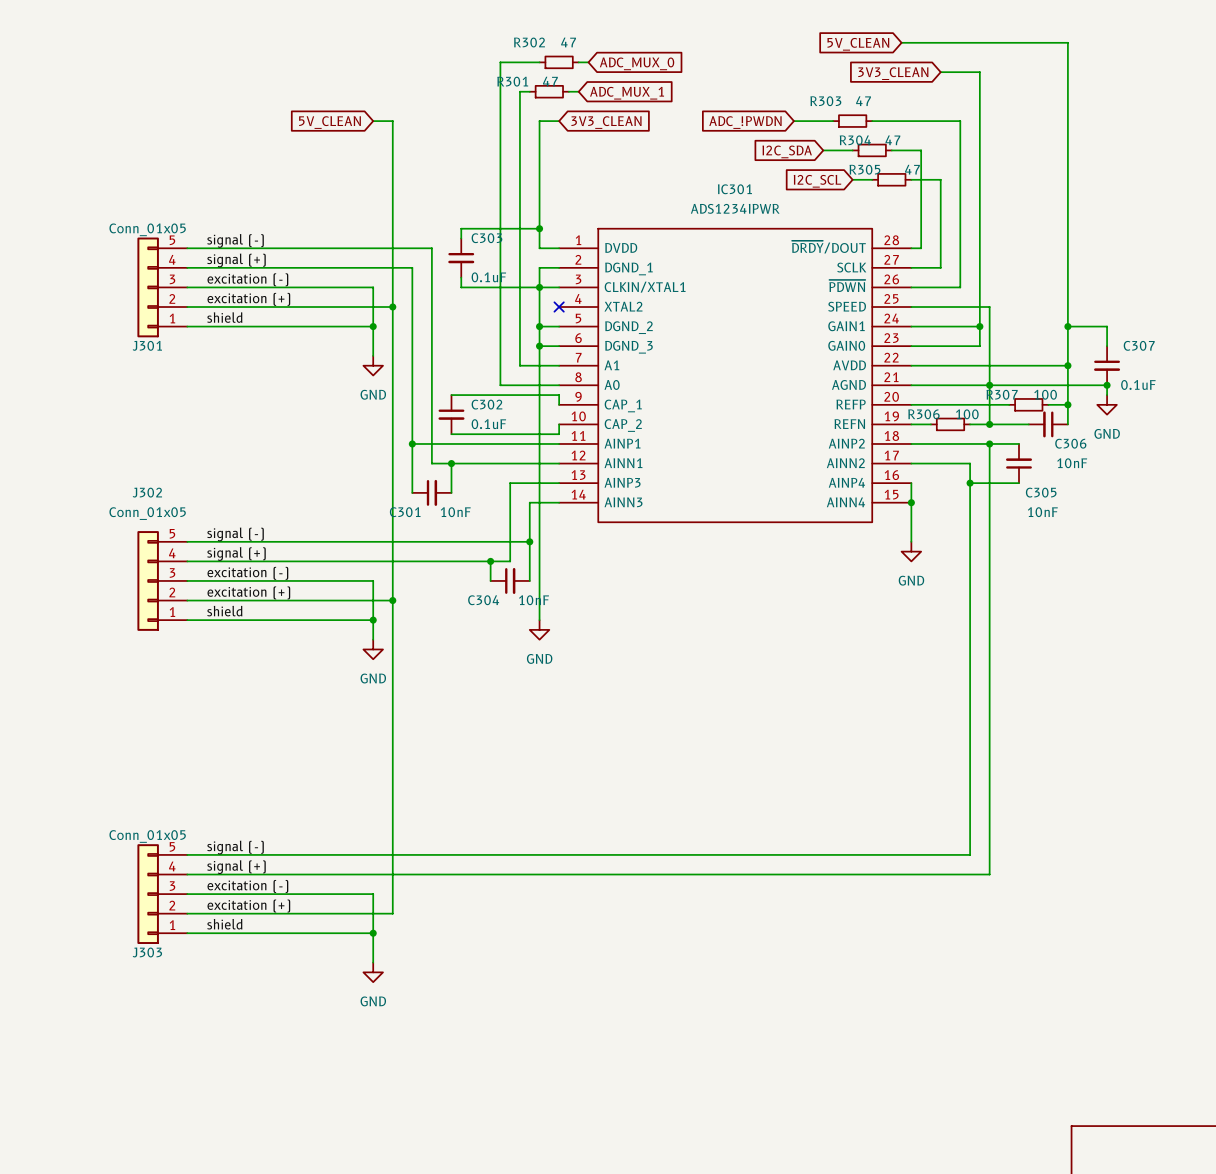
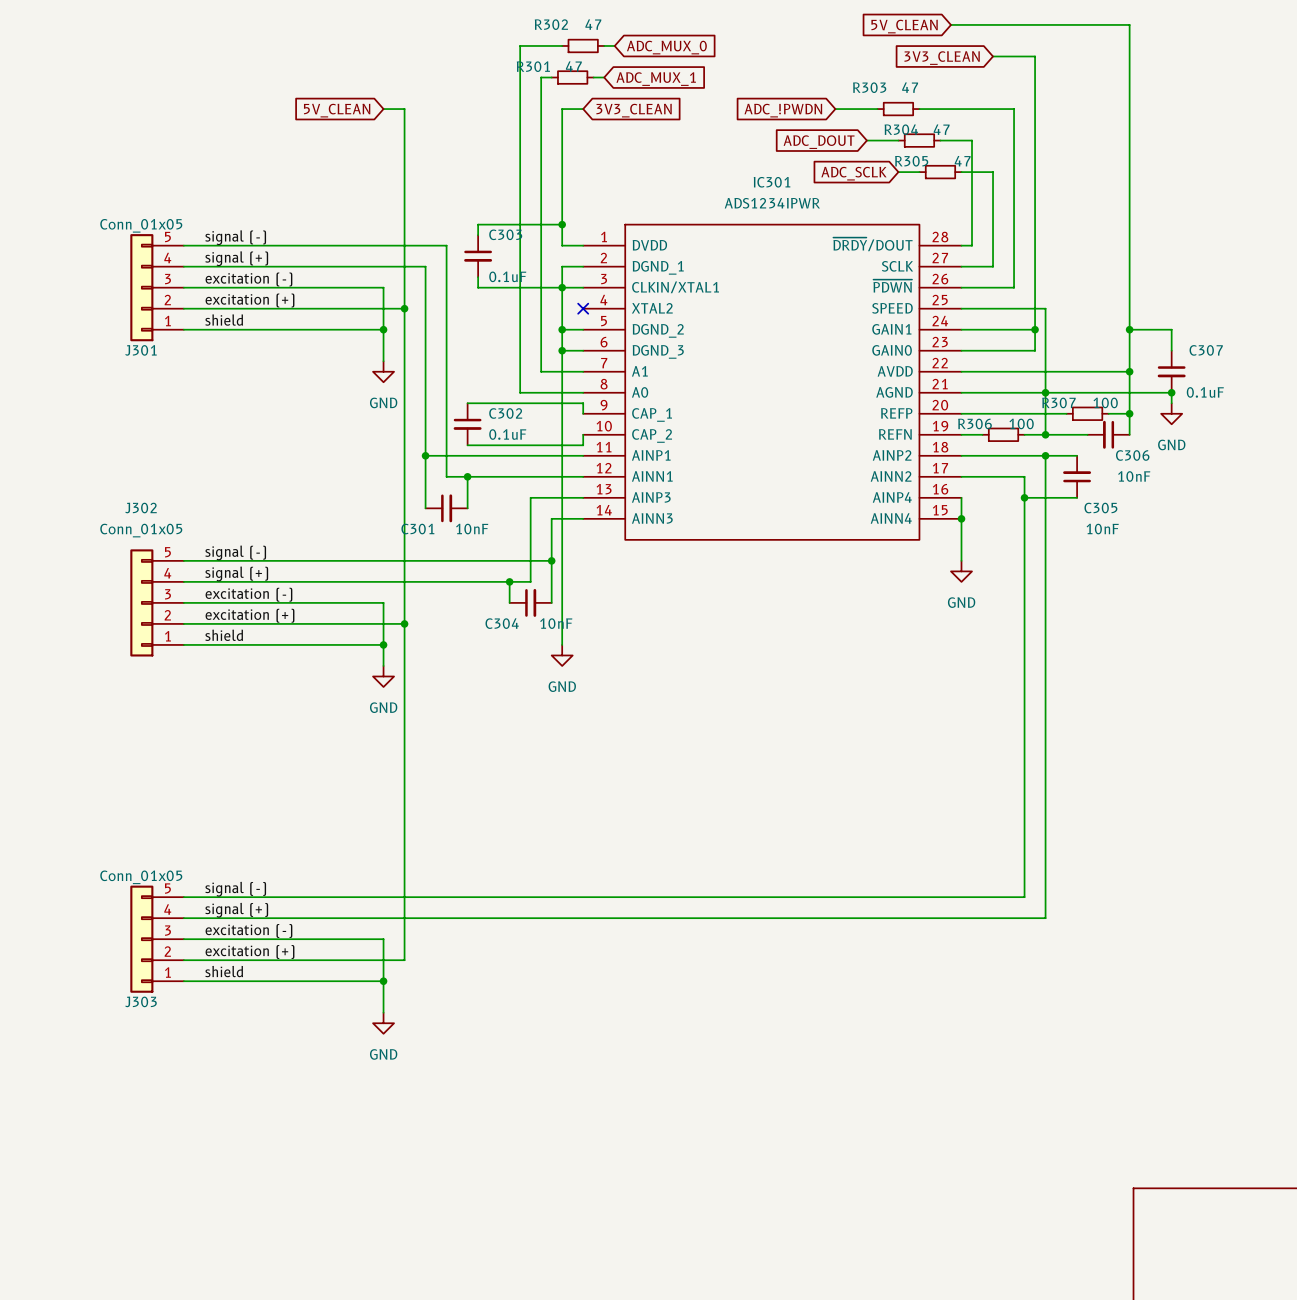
global label: I2C_SDA (787, 151) -> ADC_DOUT (819, 142)
global label: I2C_SCL (817, 181) -> ADC_SCLK (853, 173)

